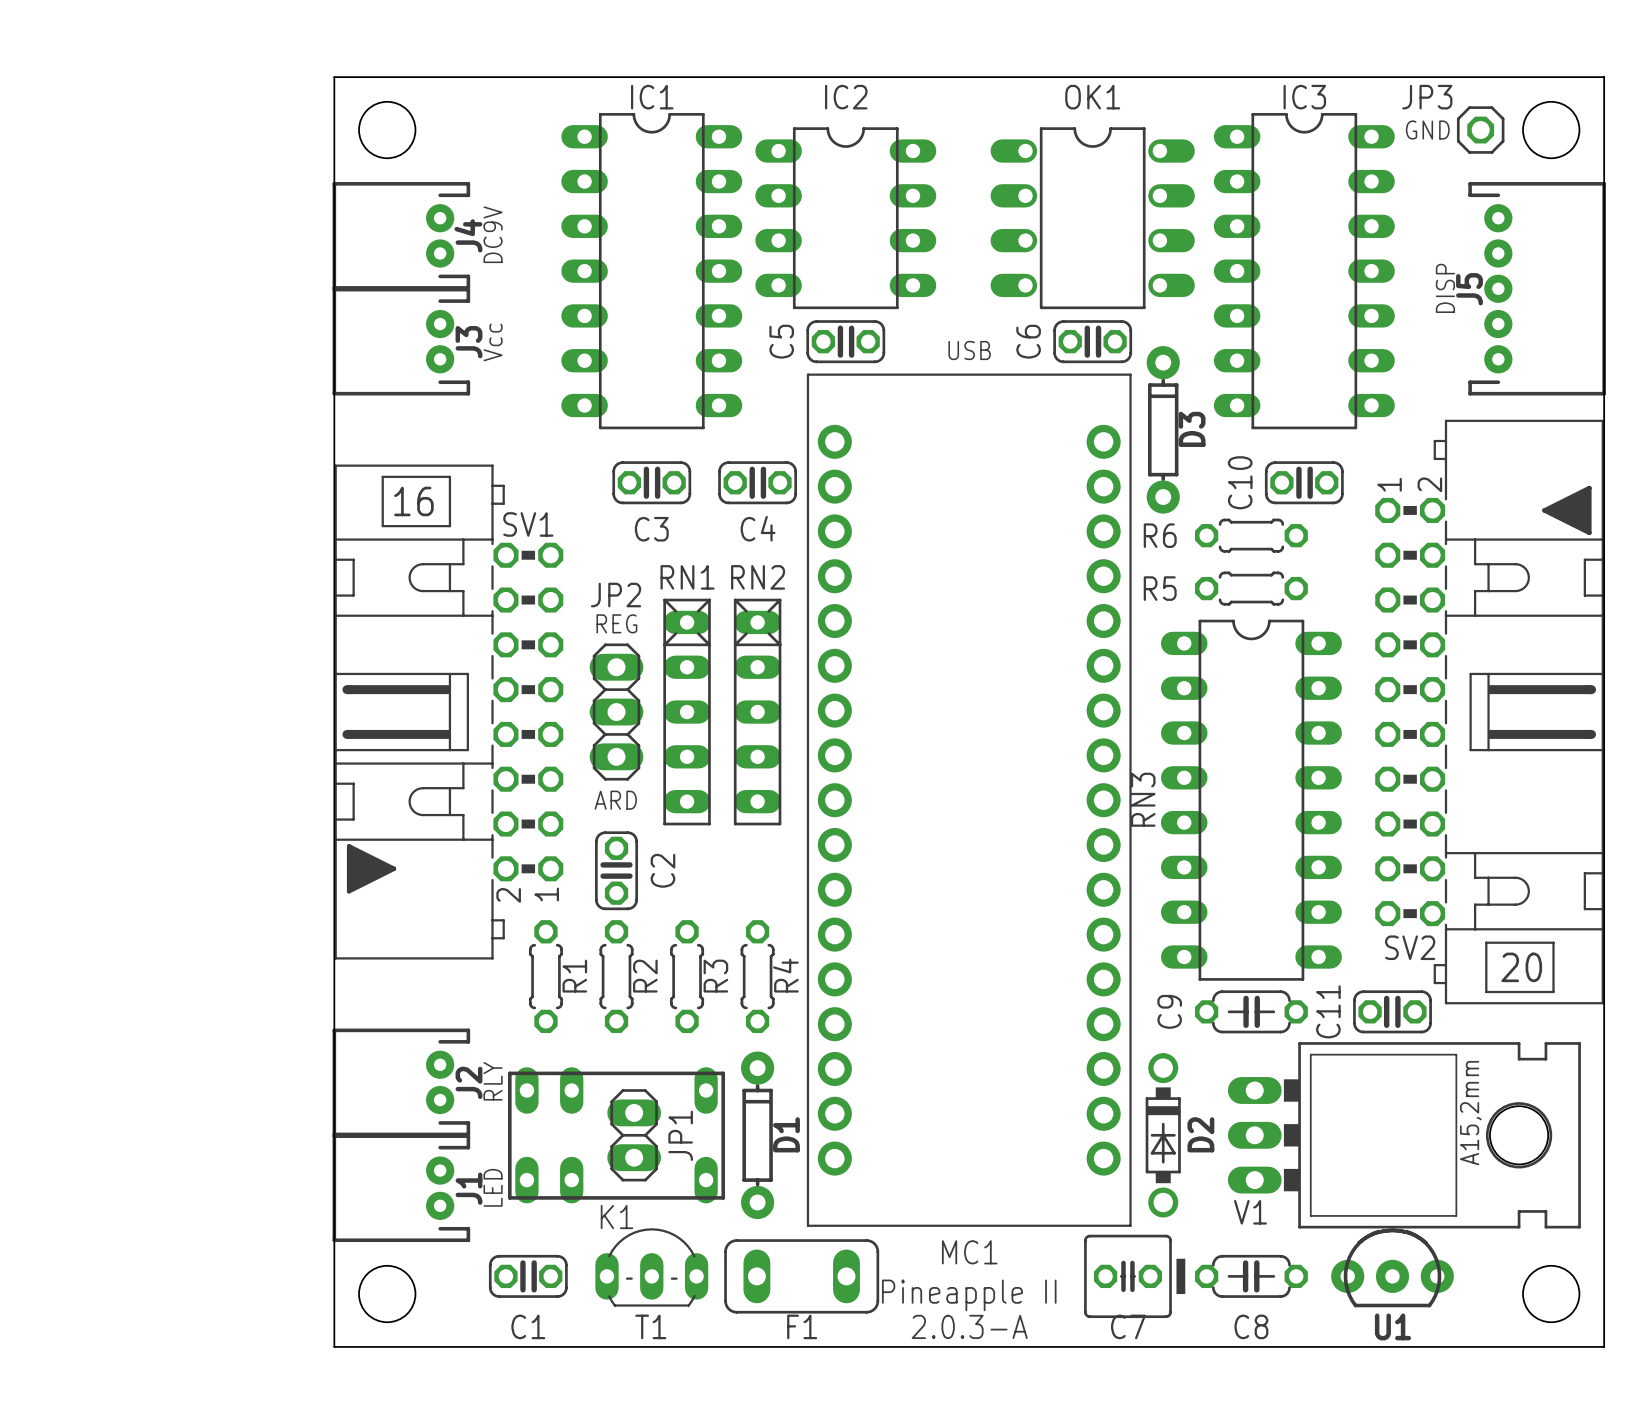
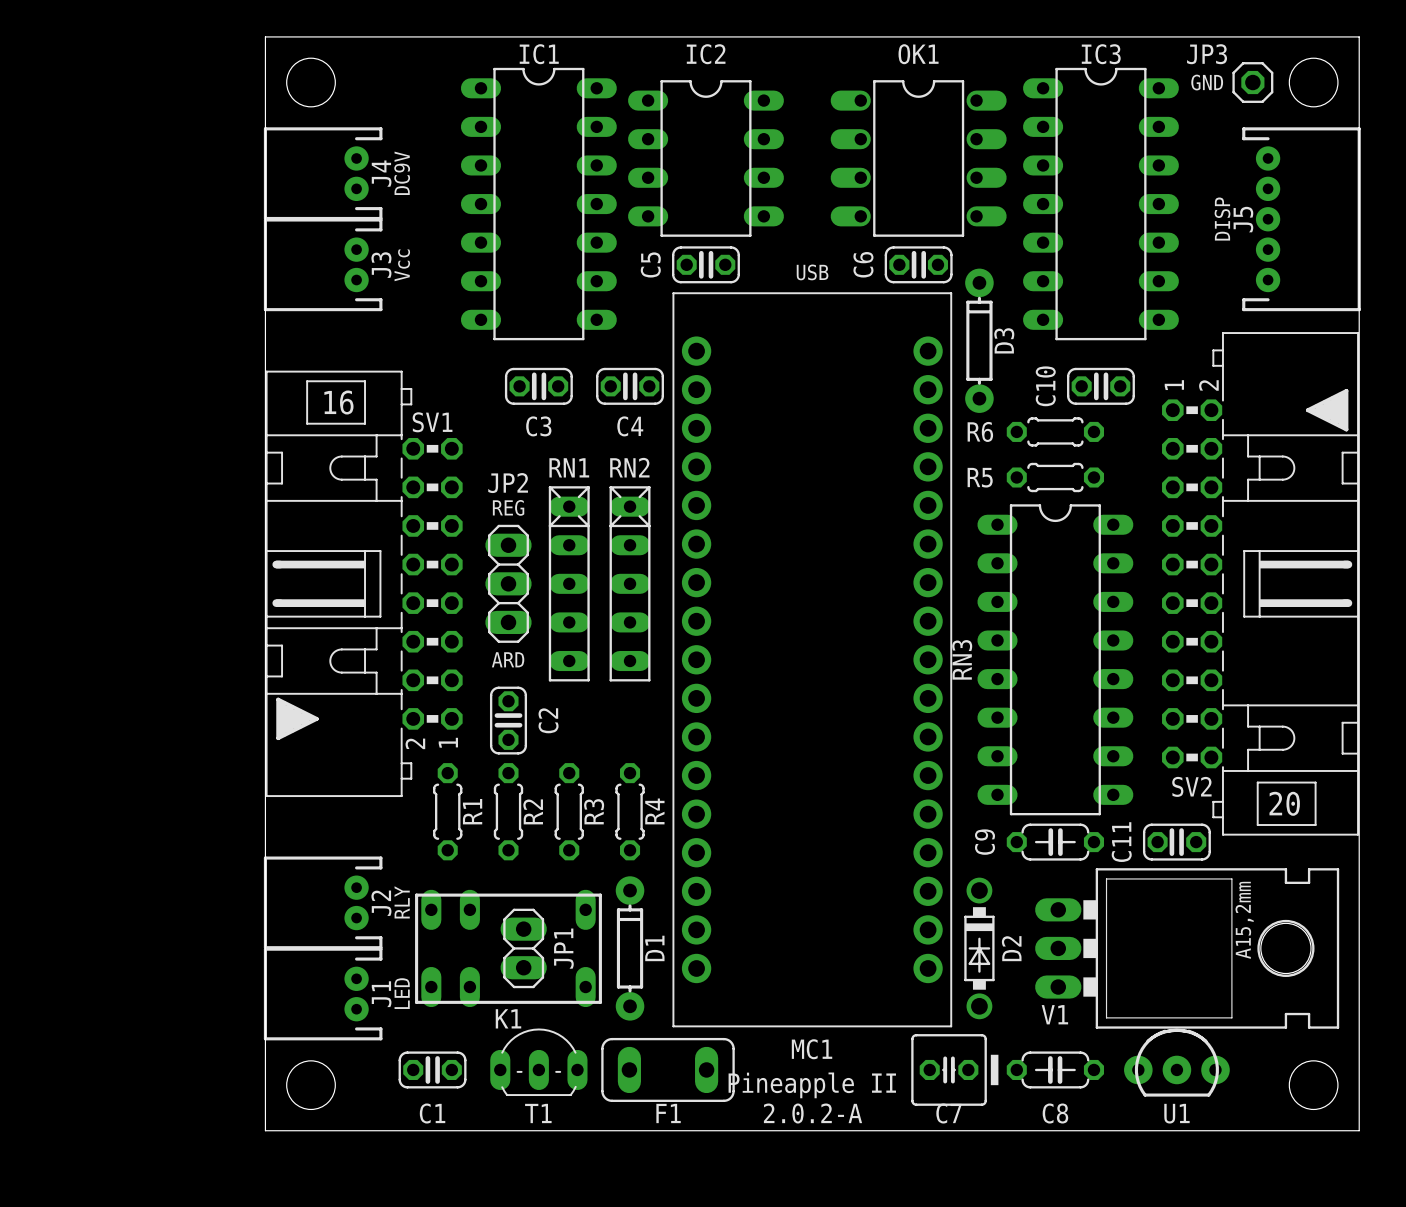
text: 2.0.3-A (969, 1326) -> 2.0.2-A (812, 1113)

